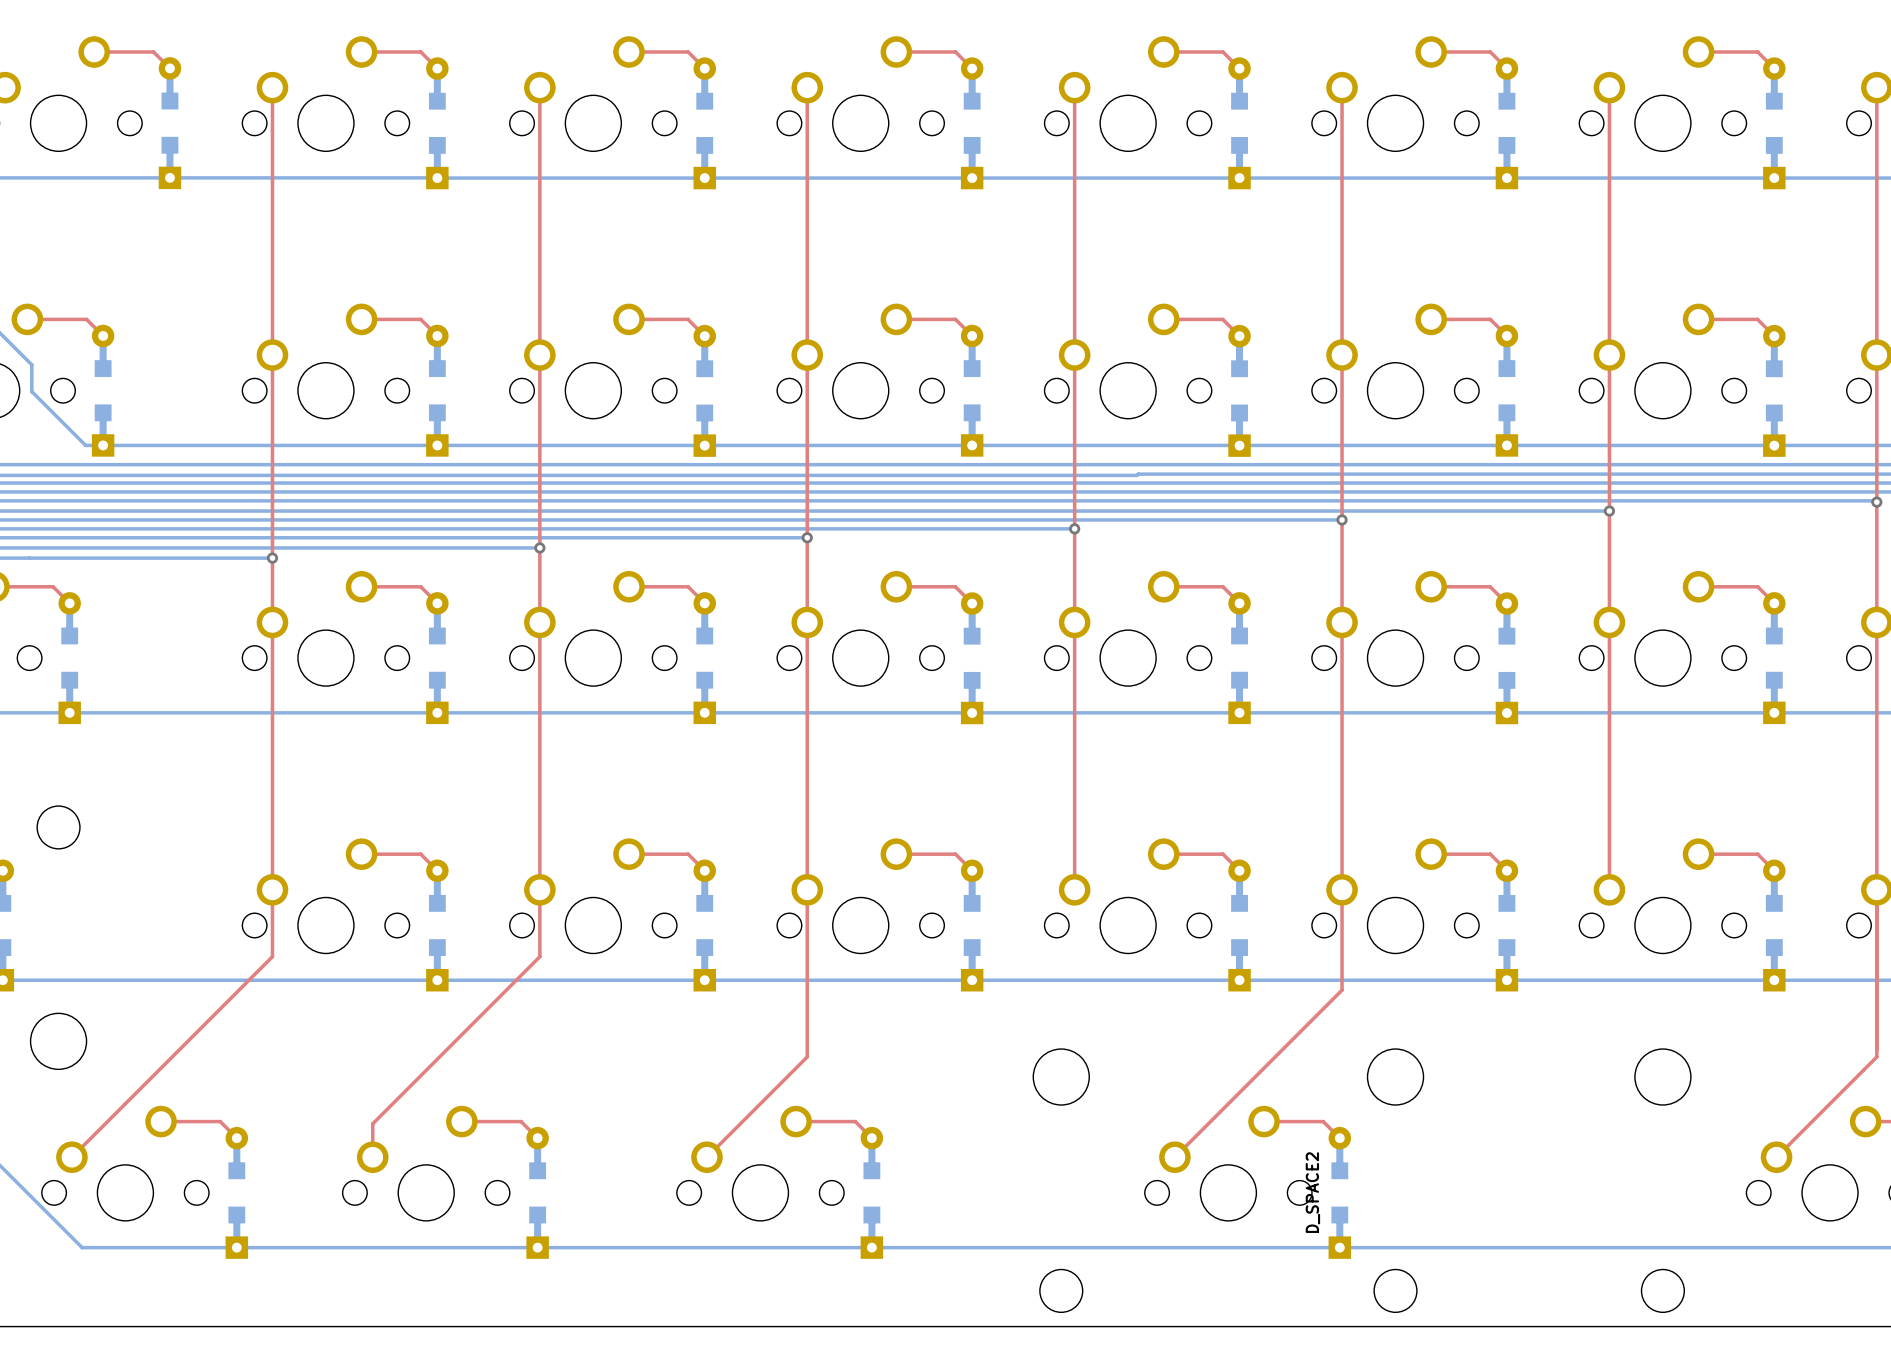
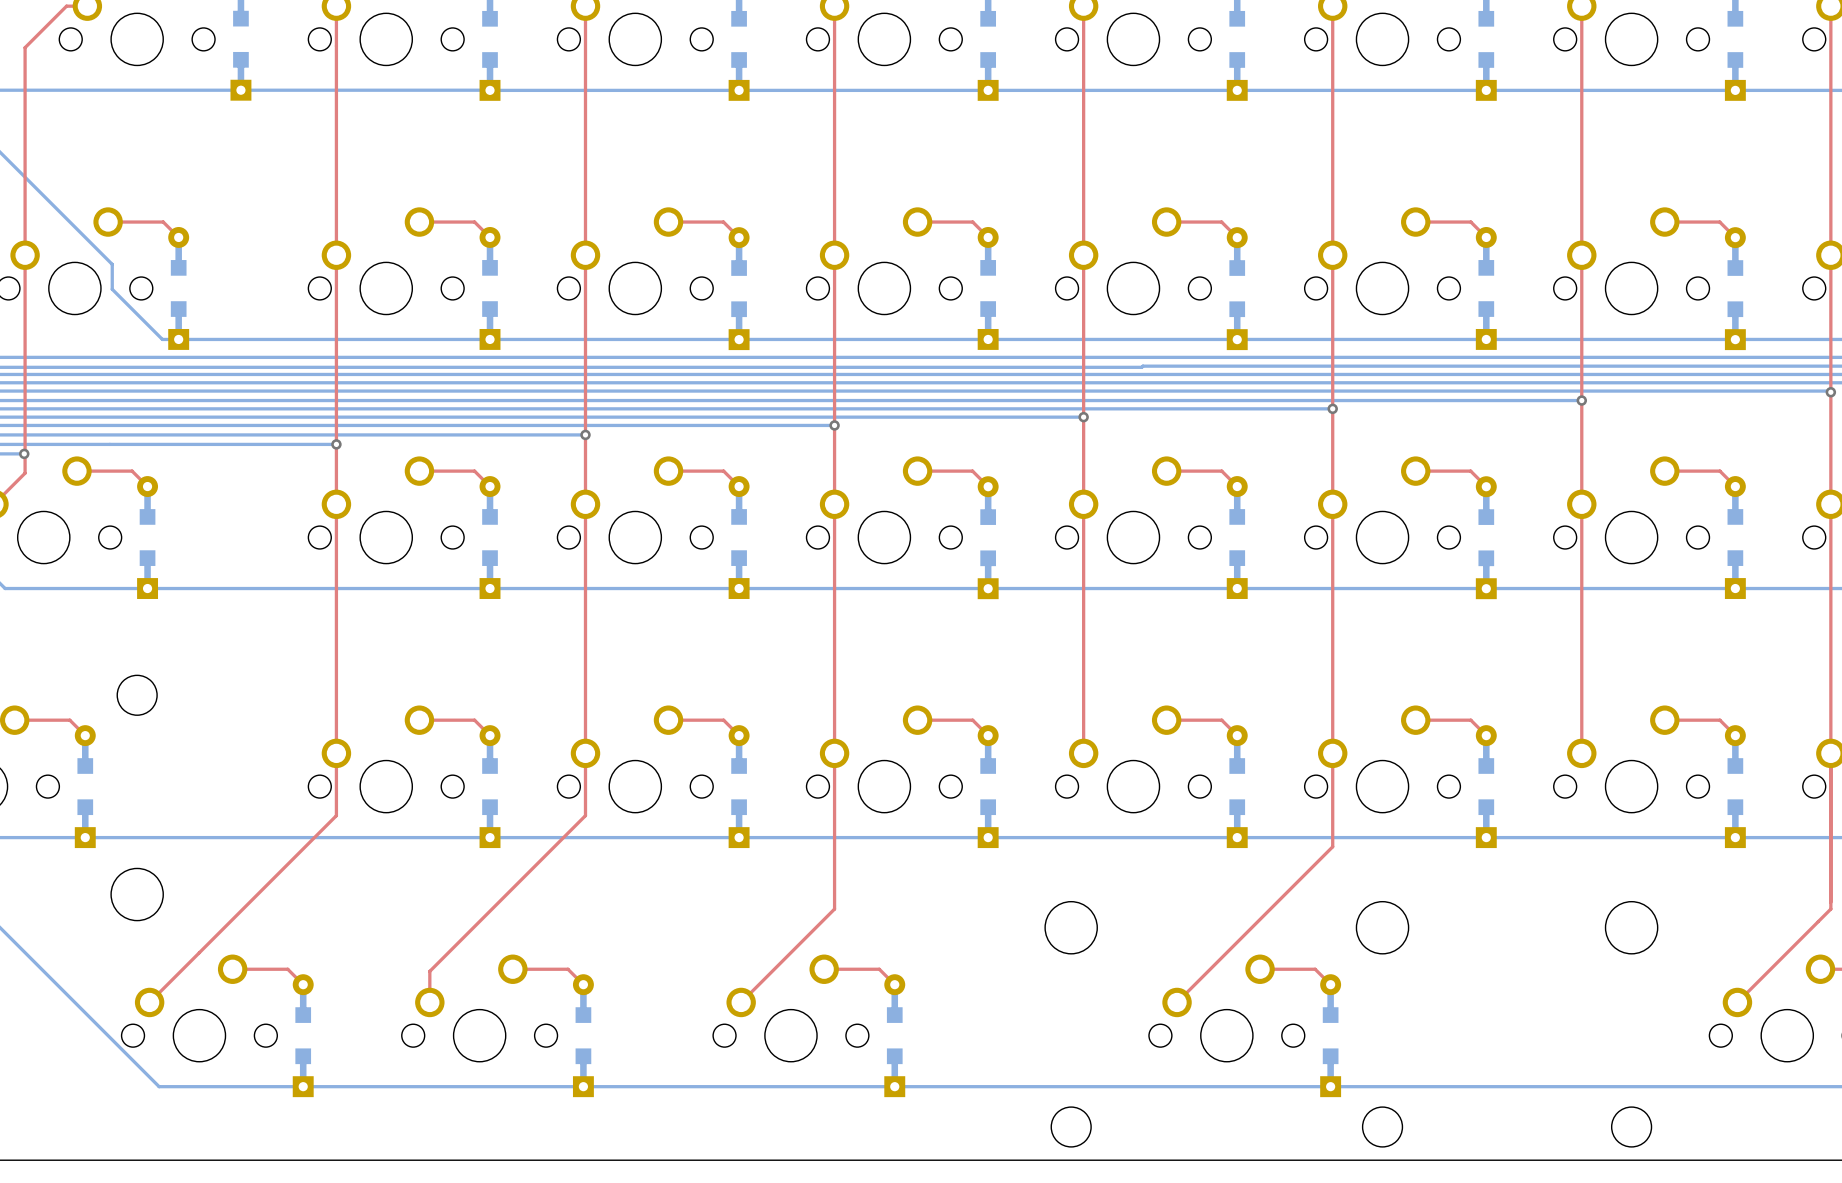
D_SPACE2 name: D_SPACE2 (1312, 1192) -> none

